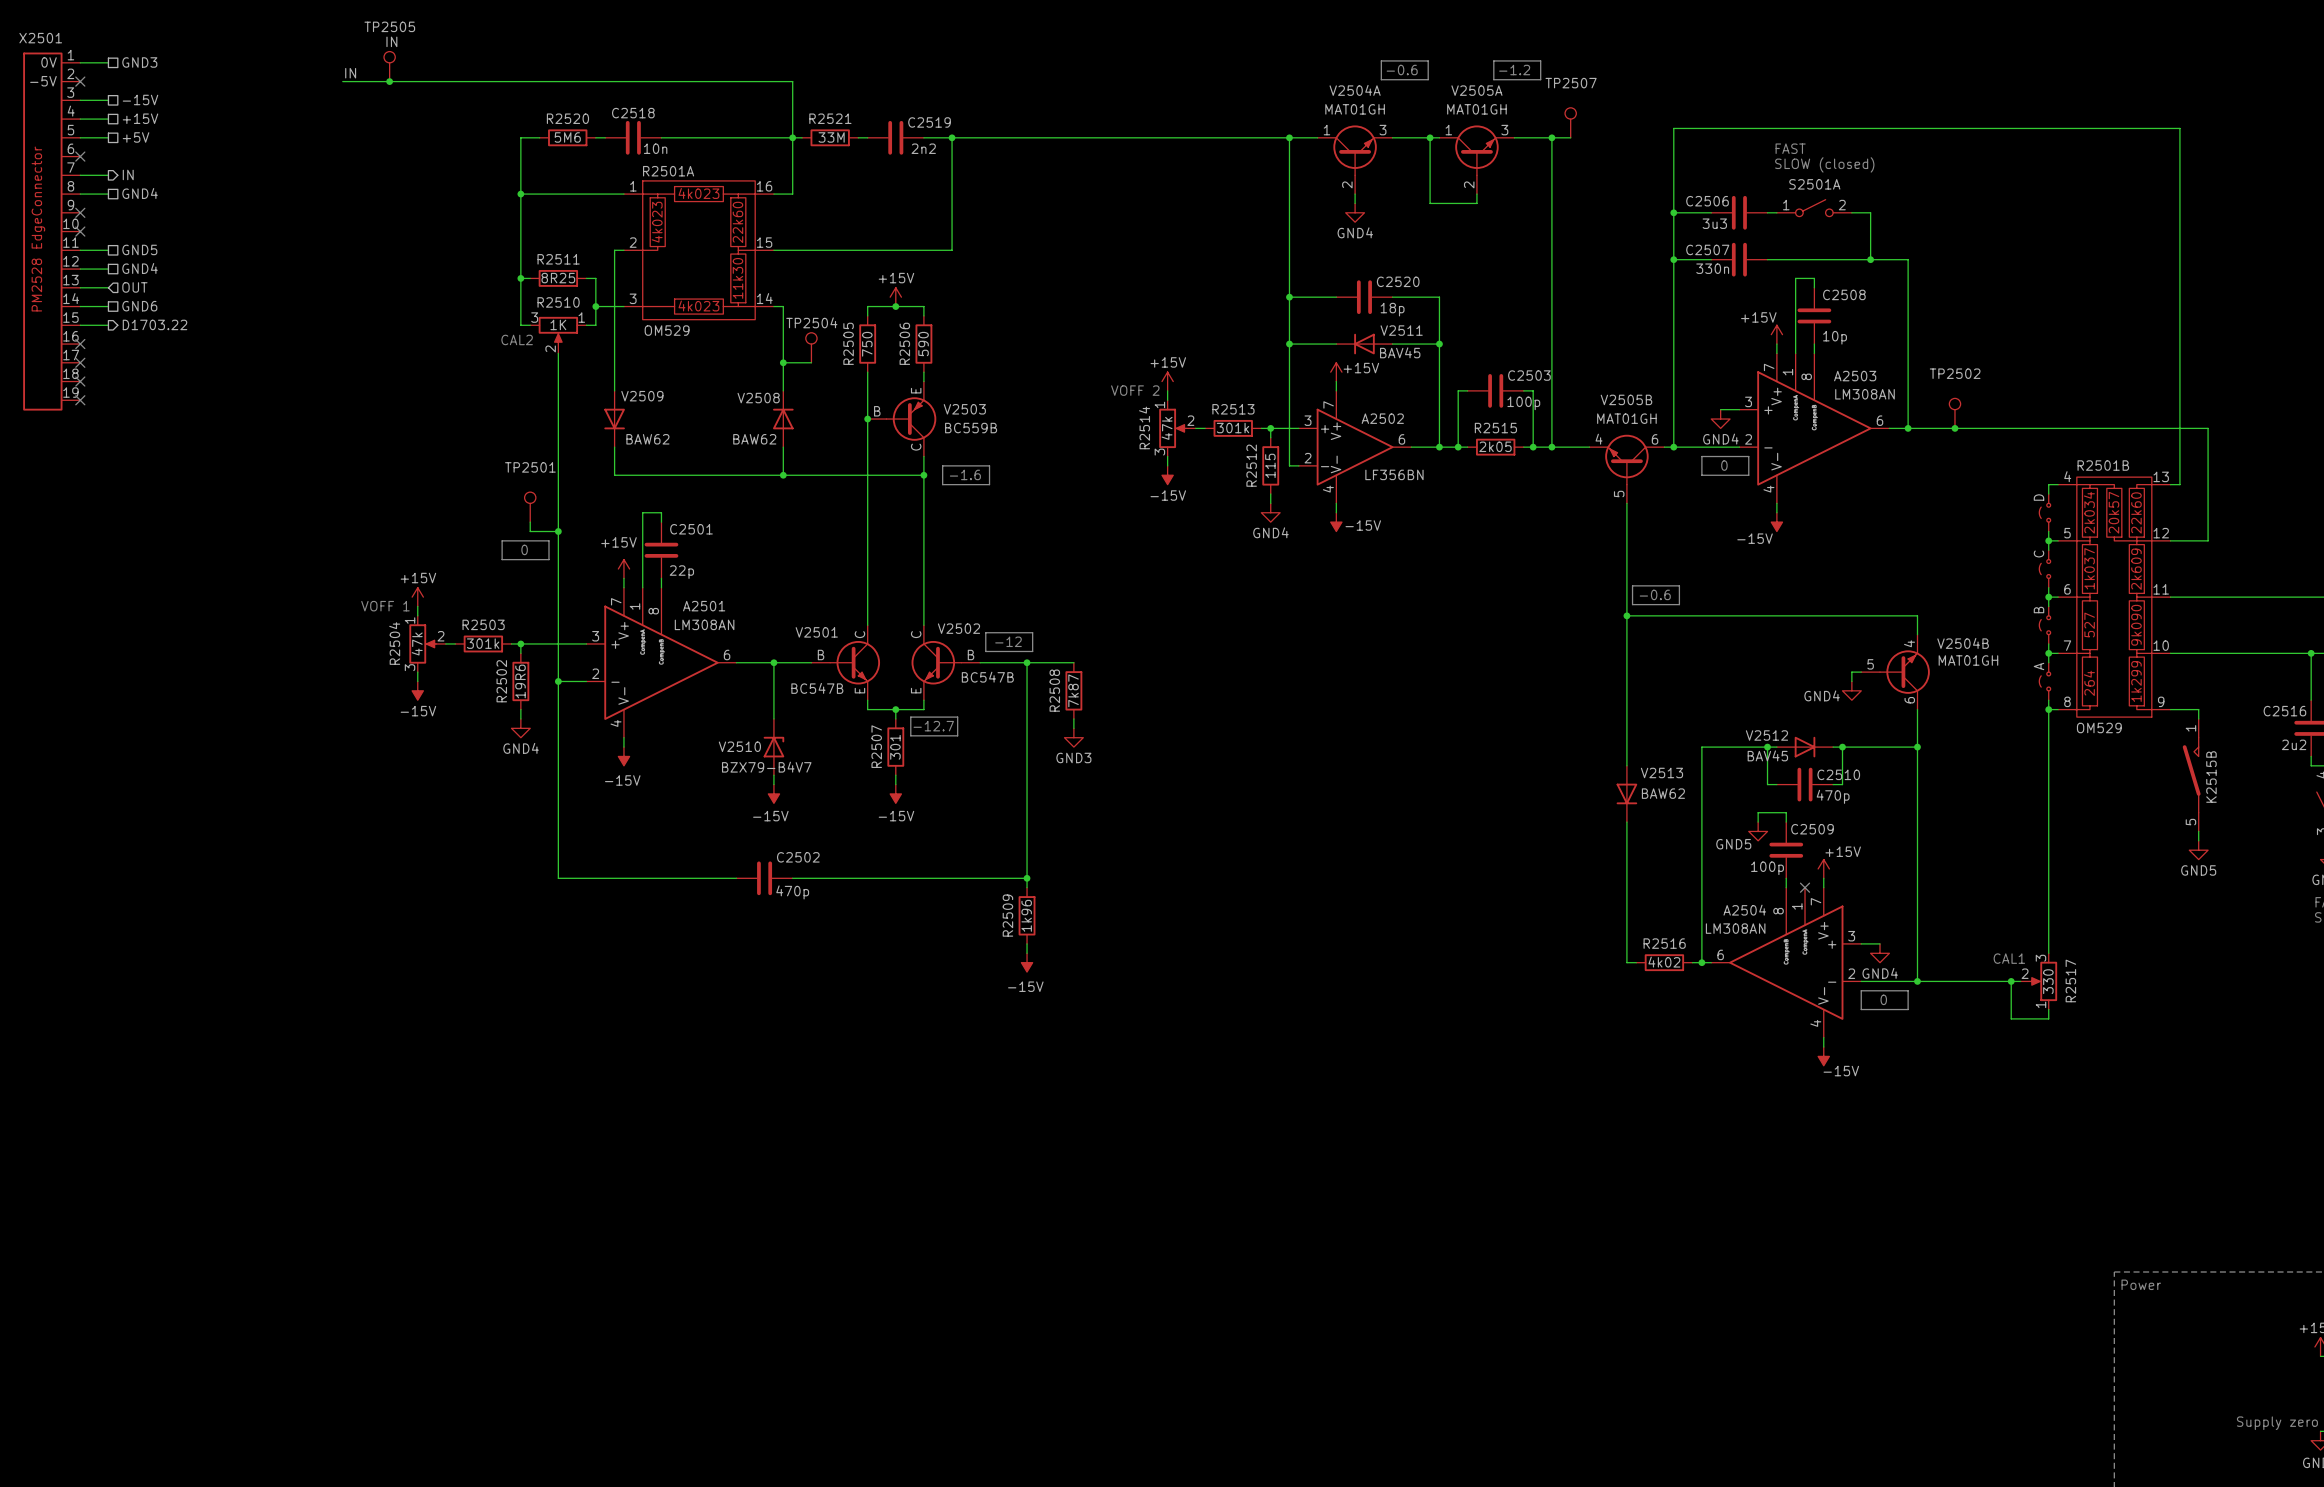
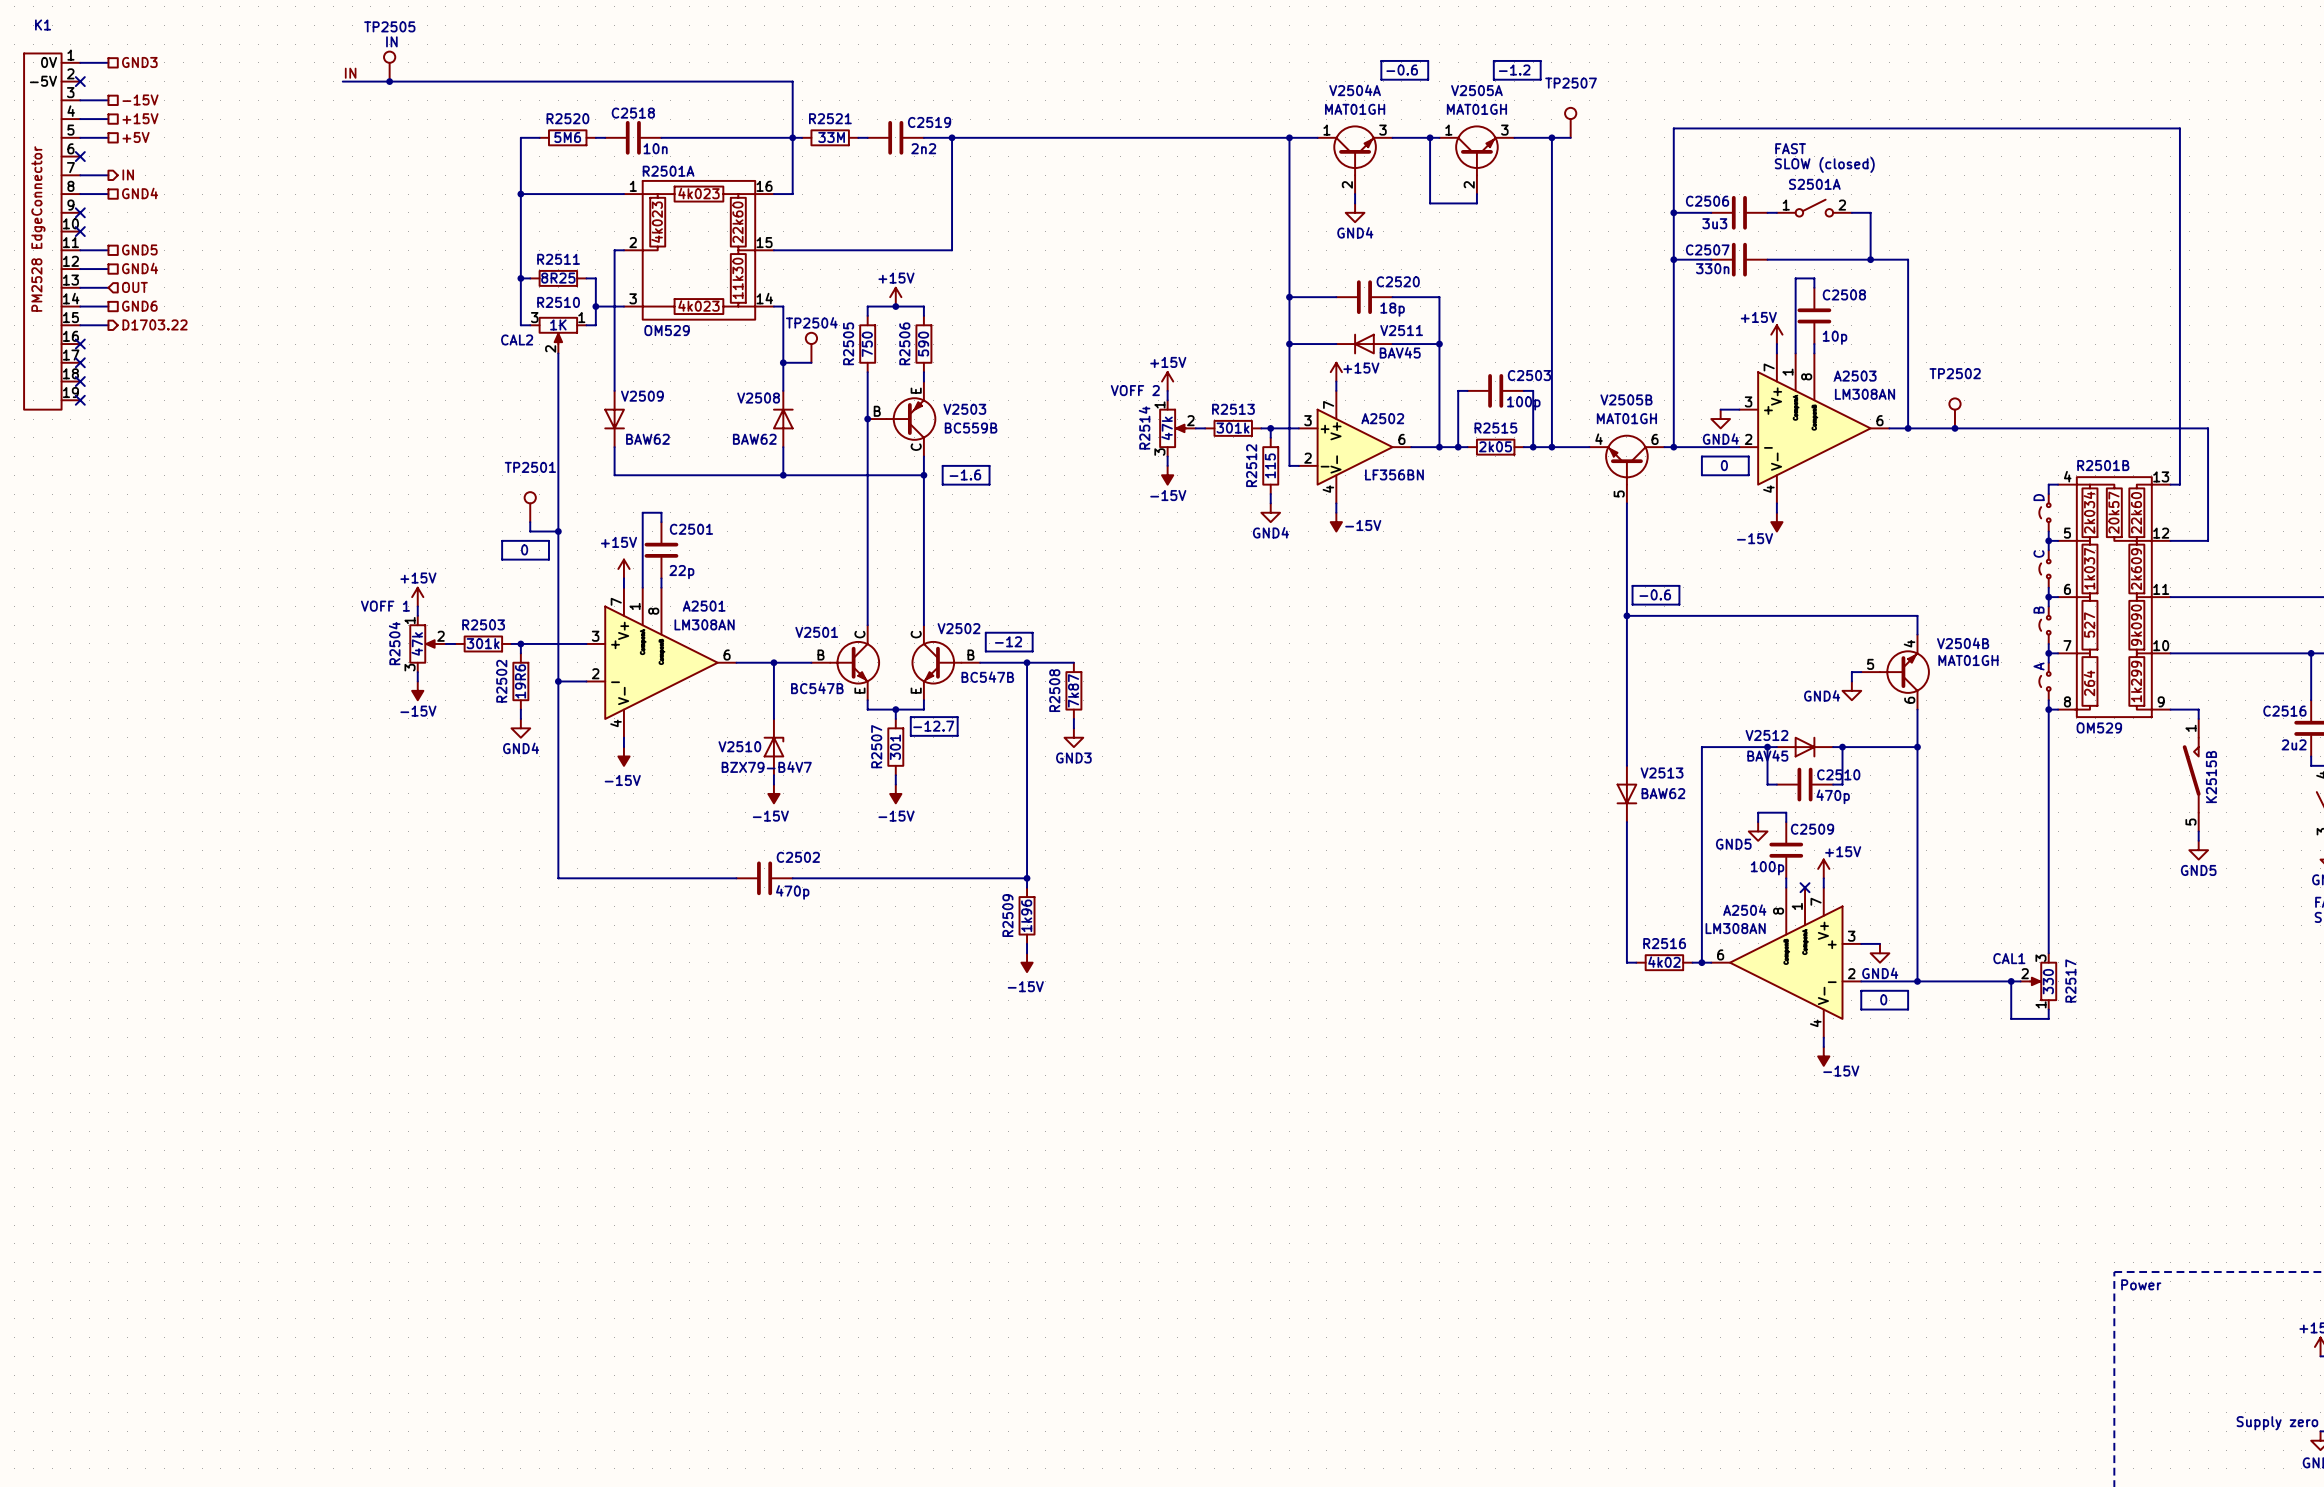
X2501 name: X2501 (40, 38) -> K1 (43, 24)

